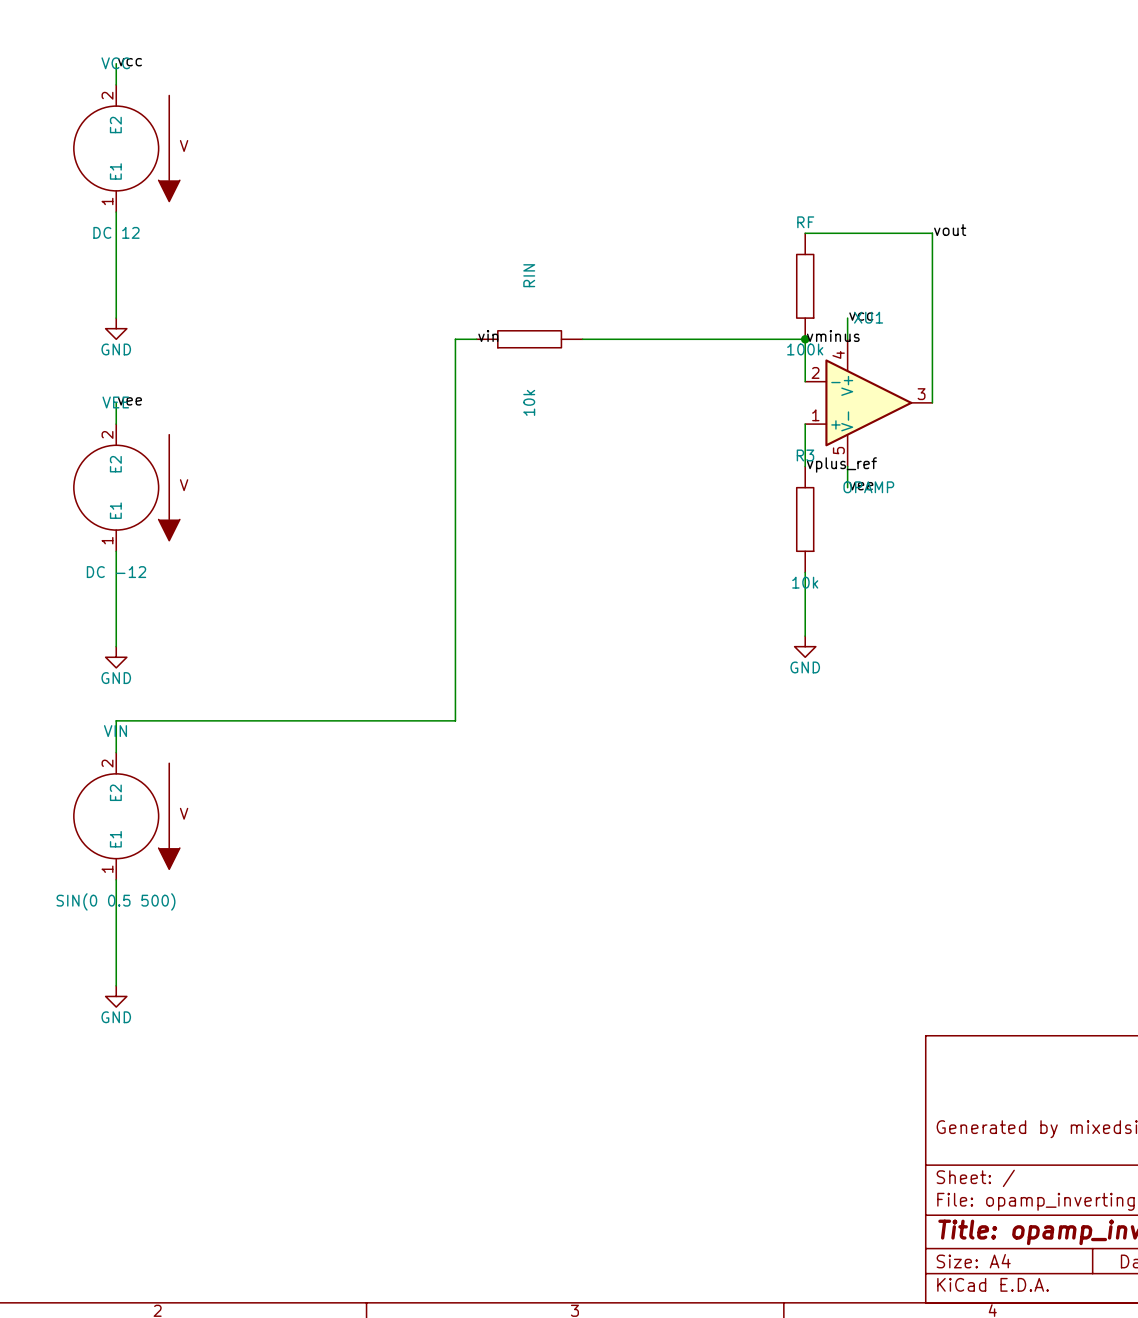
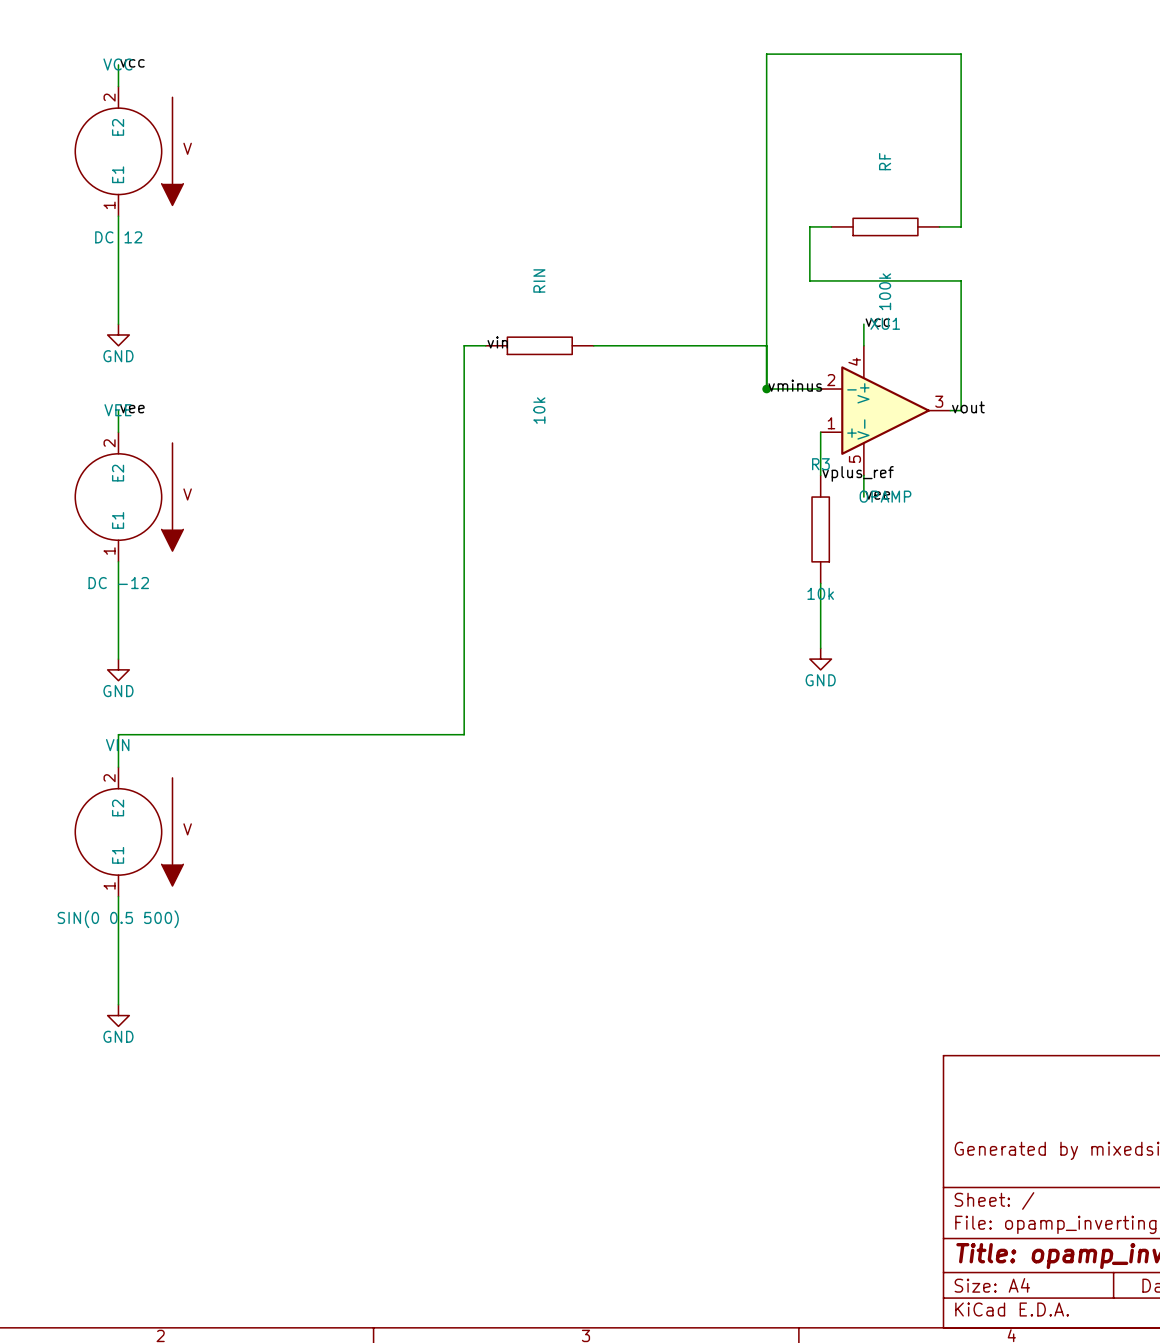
label position: vout (950, 230) -> vout (968, 407)
wire: (805, 233) (932, 233) (932, 402) -> (831, 226) (809, 226) (809, 280) (961, 280) (961, 410) (950, 410)
RF rotation: 0° (805, 286) -> 90° clockwise (885, 226)
RF position: (805, 286) -> (885, 226)
label position: vminus (833, 336) -> vminus (795, 385)
wire: (752, 339) (805, 339) (805, 381) -> (939, 226) (961, 226) (961, 54) (766, 54) (766, 389) (820, 389)
junction: (805, 339) -> none
junction: none -> (766, 389)

